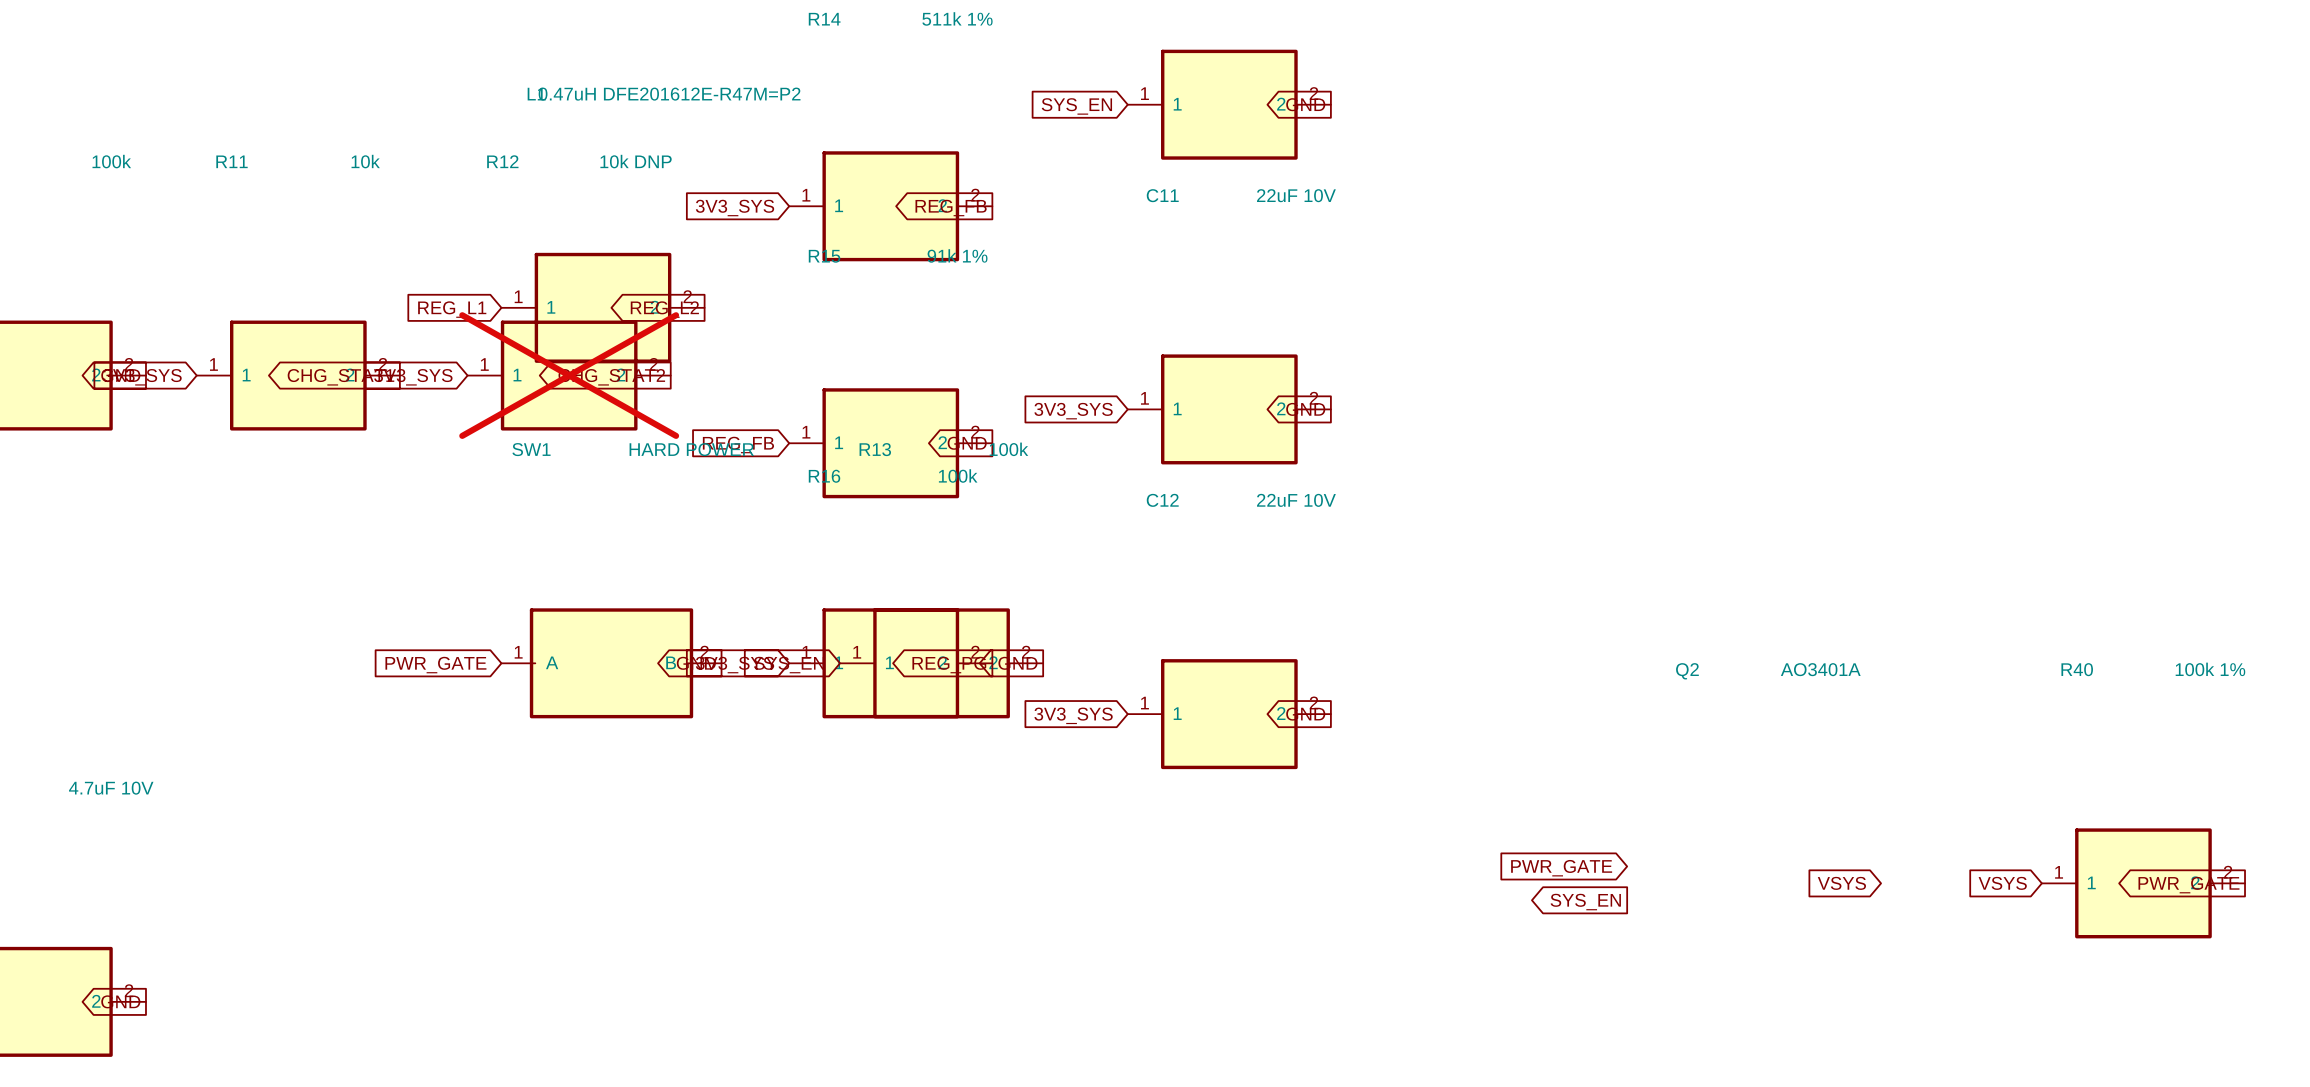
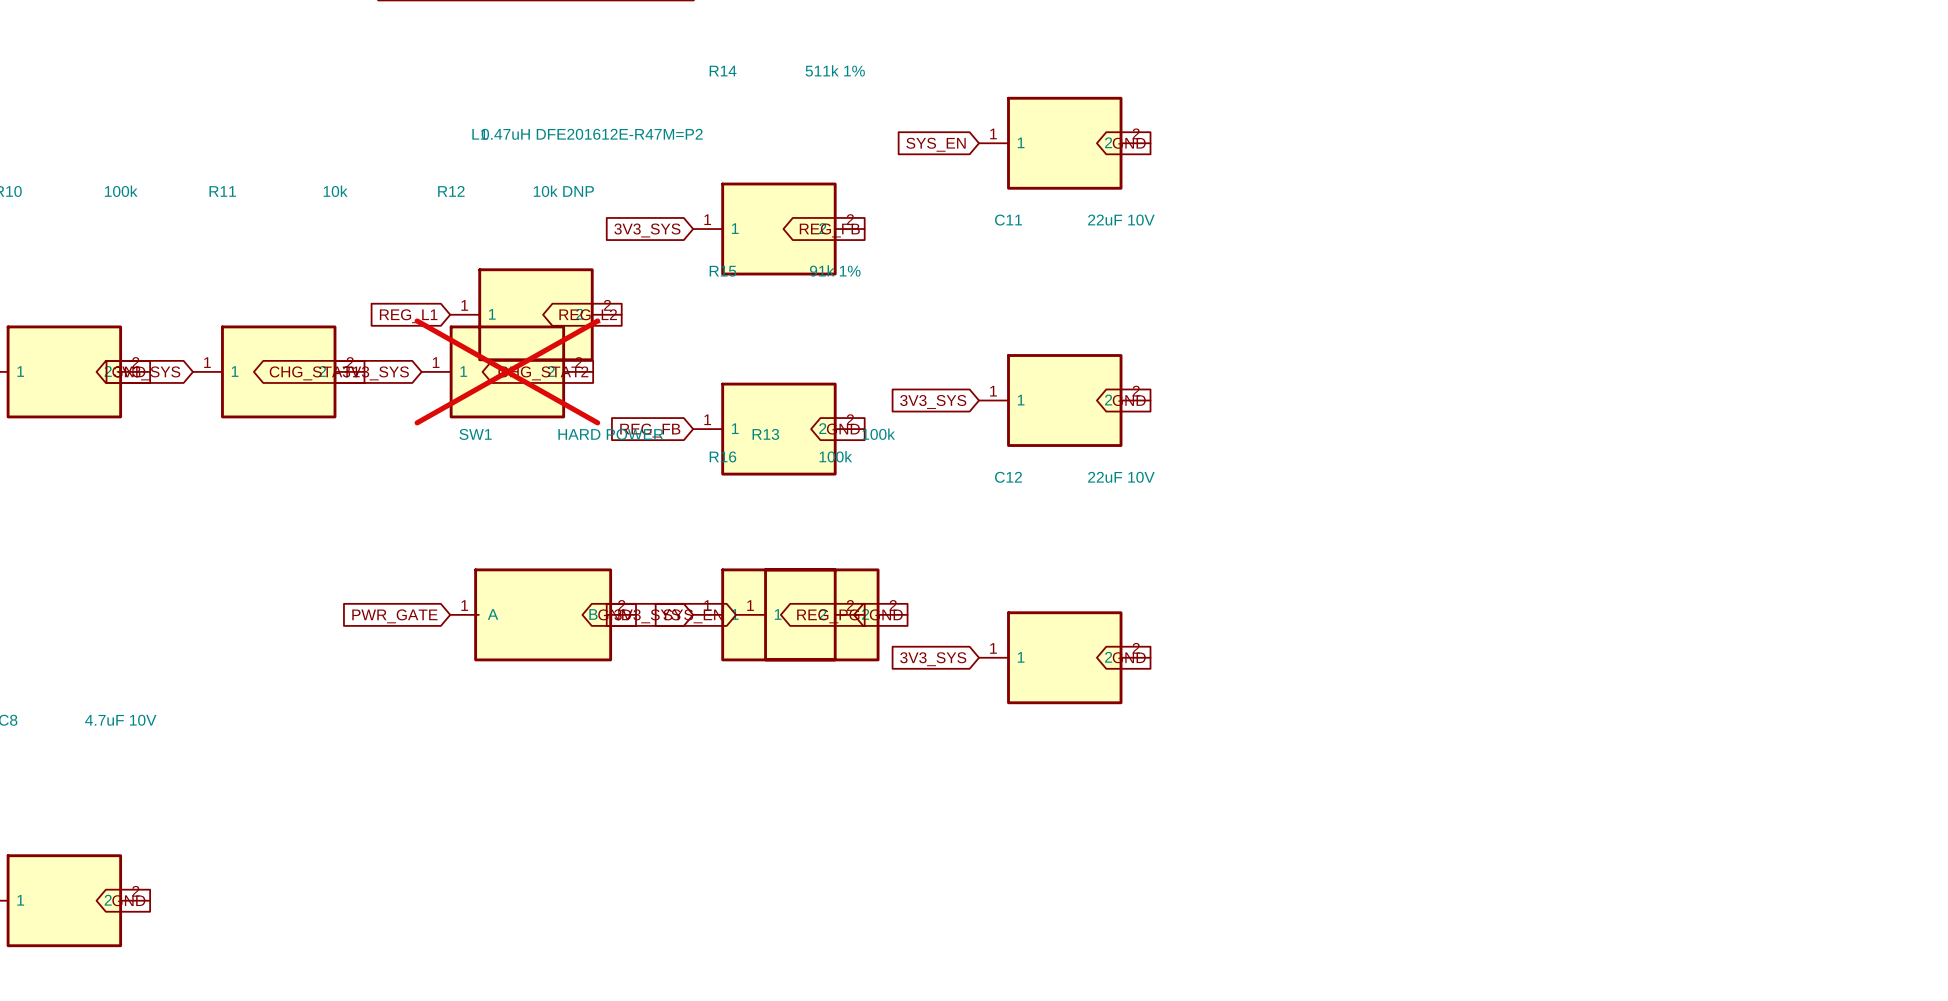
Q2: AO3401A (1768, 671) -> none
global label: PWR_GATE (1561, 868) -> none
global label: VSYS (1841, 883) -> none
global label: VSYS (2002, 883) -> none
R40: 100k 1% (2143, 883) -> none
global label: PWR_GATE (2188, 885) -> none
global label: SYS_EN (1585, 902) -> none

